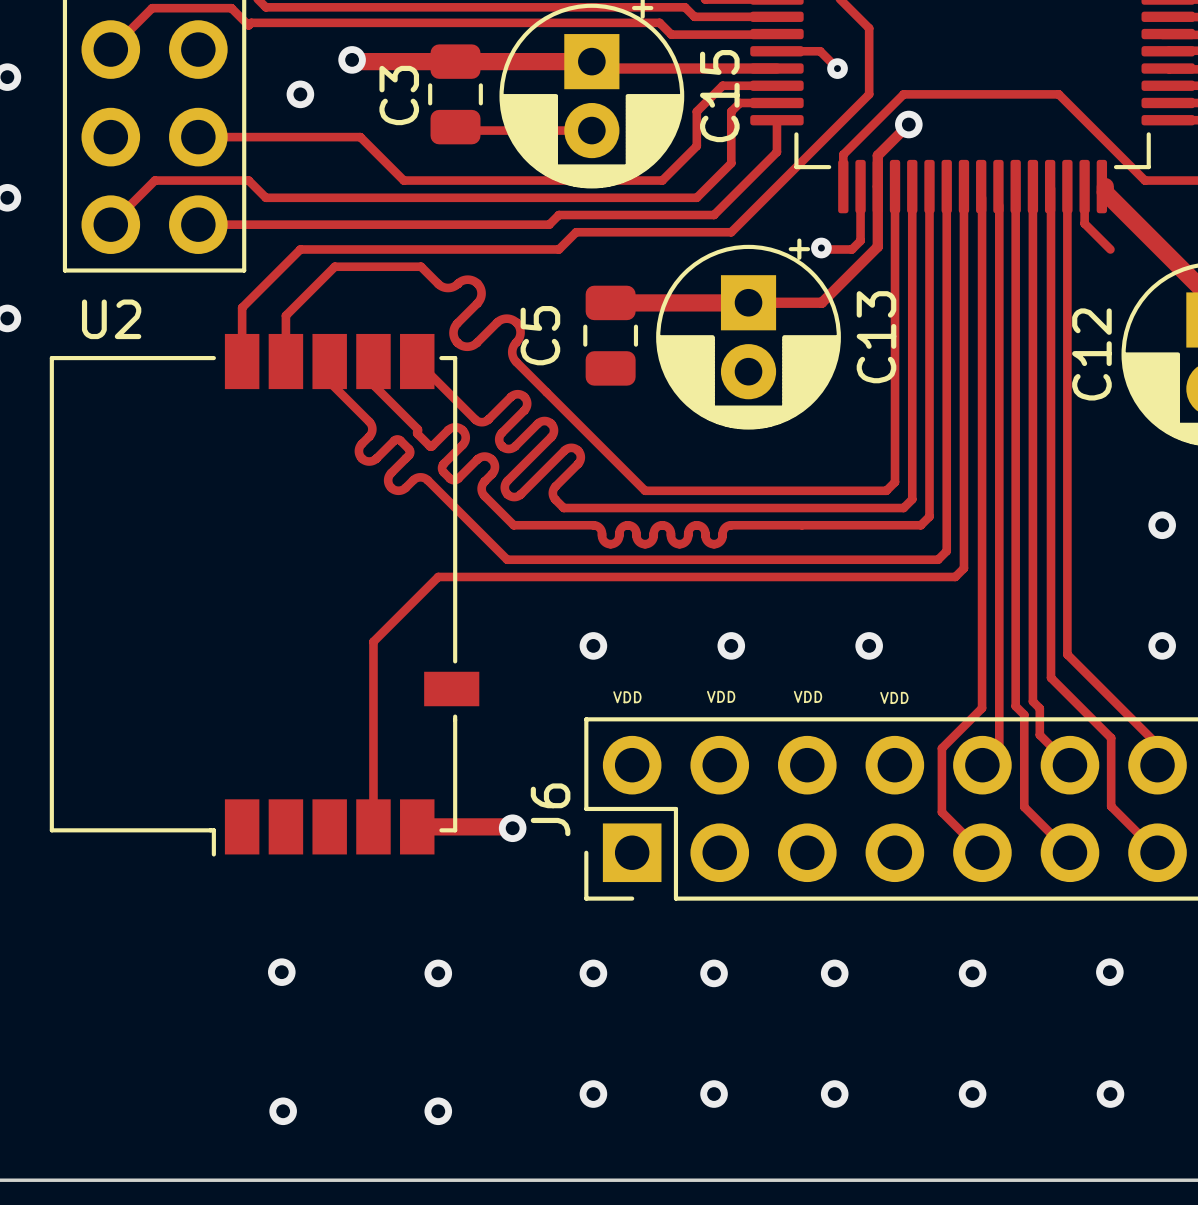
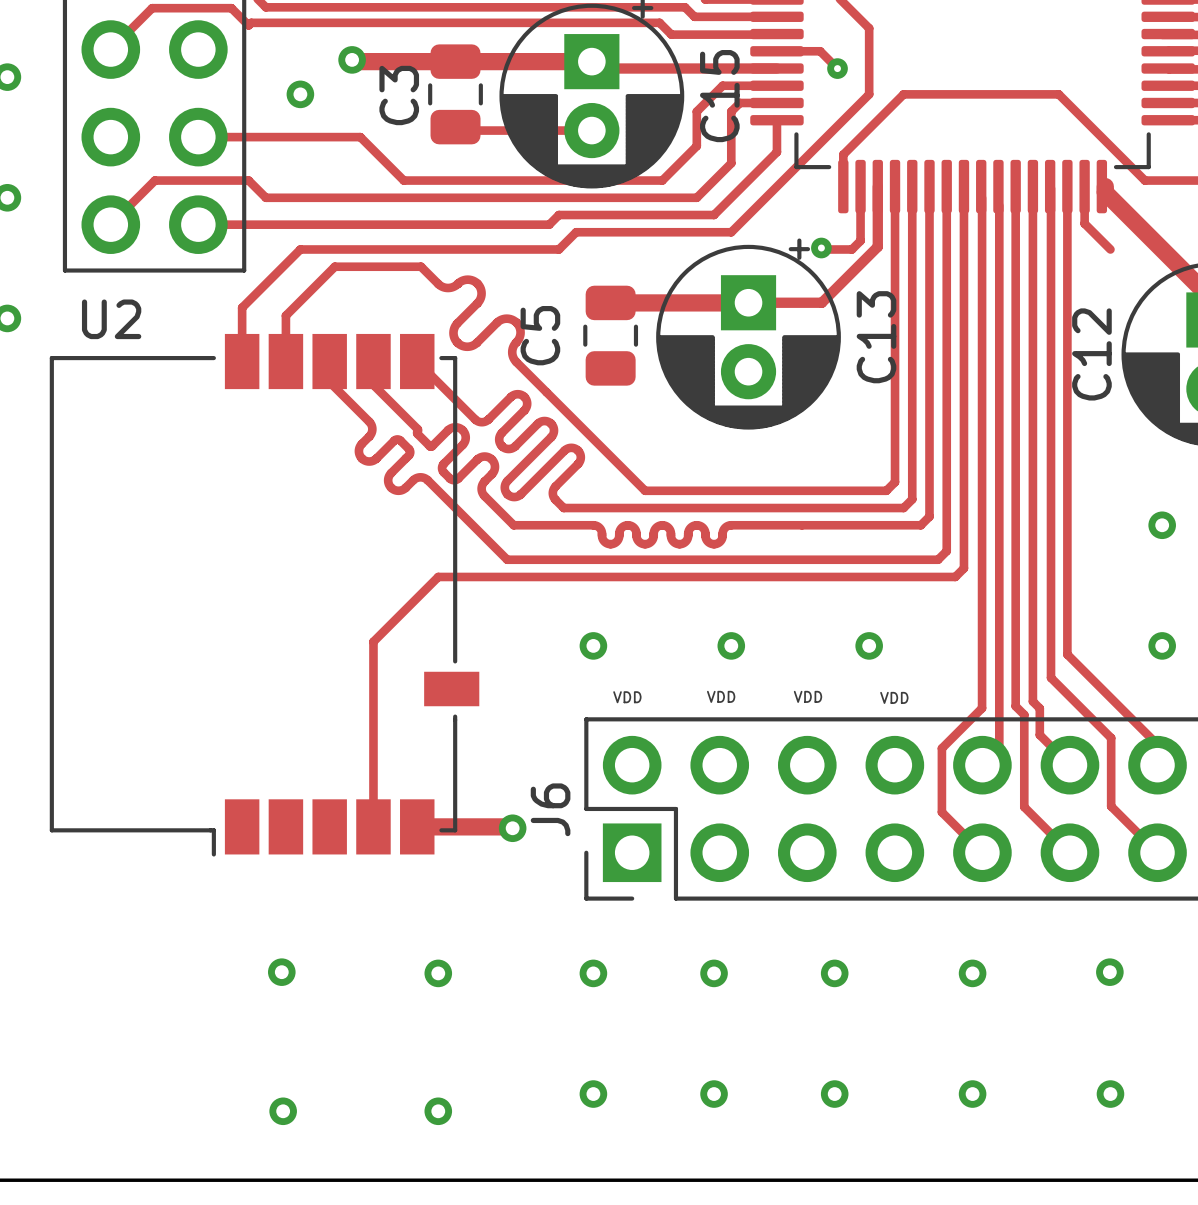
track: (908, 124) (877, 155) (877, 186) -> none
via: (908, 124) -> none

